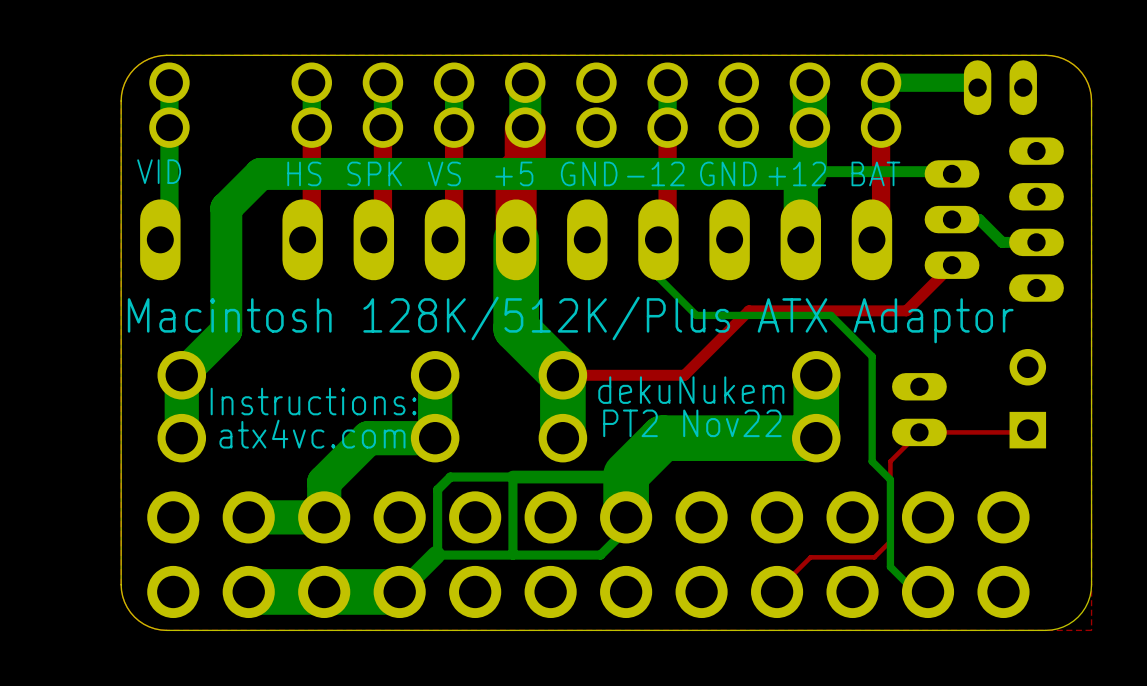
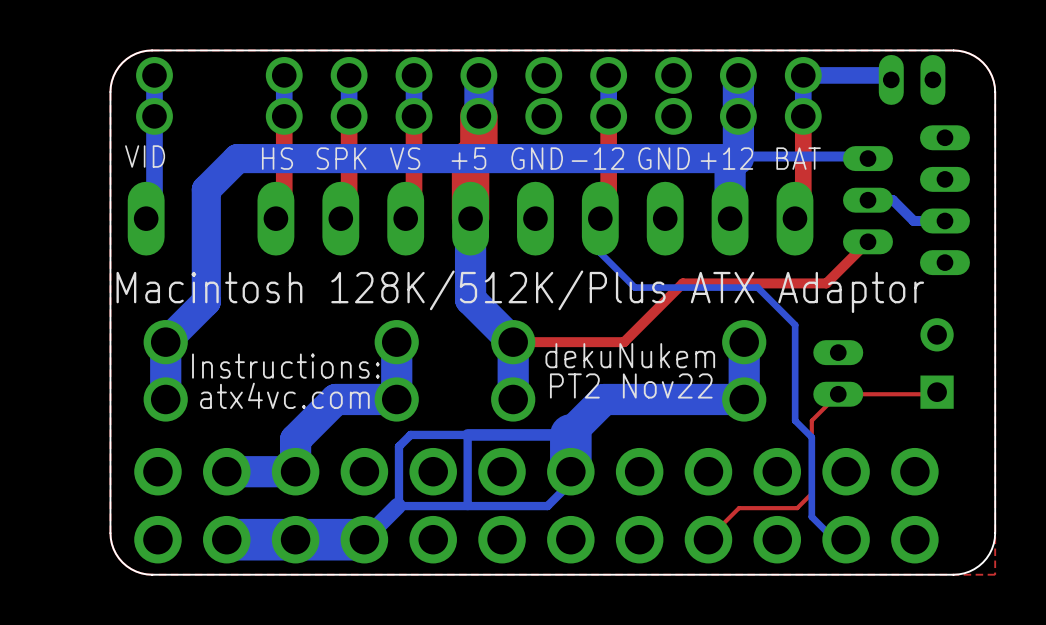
bottom track width: thick (516, 239) (516, 328) (562, 375) (562, 438) -> thin (470, 218) (470, 299) (513, 342) (513, 399)
bottom track width: thick (816, 375) (816, 438) (662, 438) (626, 474) -> thin (744, 342) (744, 399) (604, 399) (570, 432)

